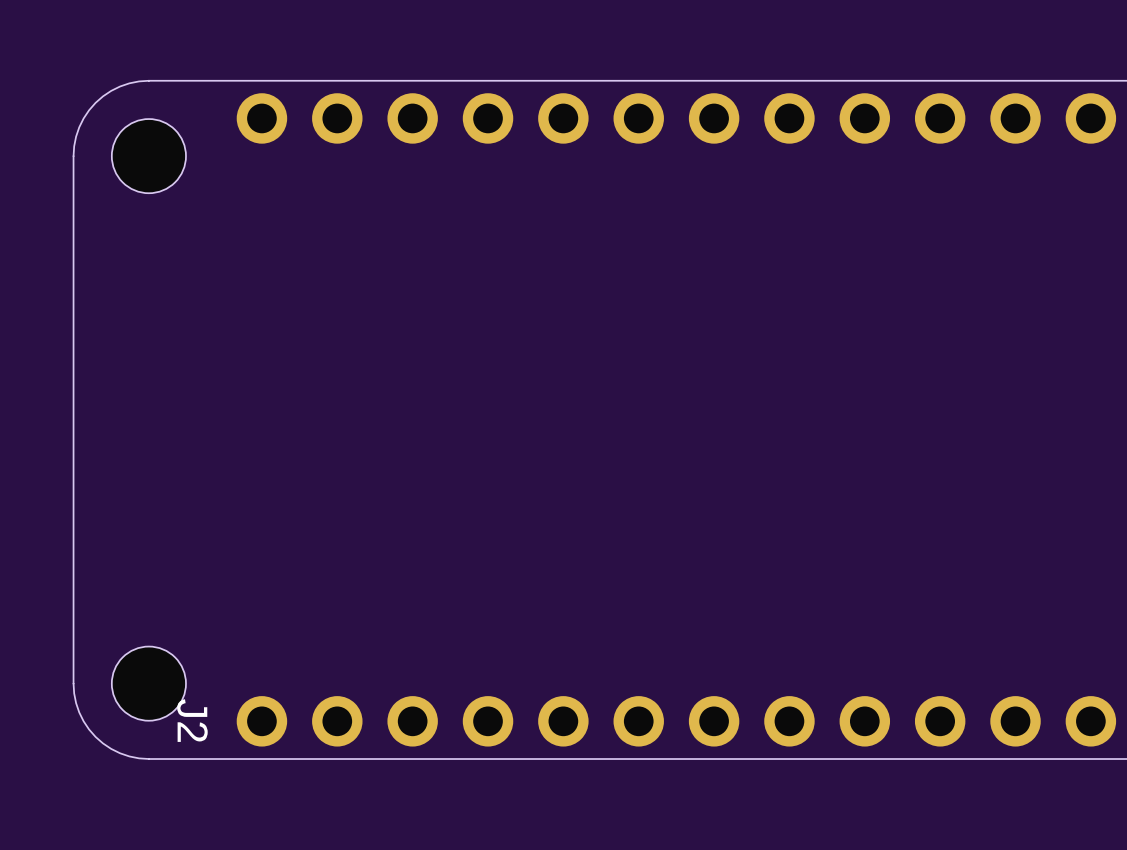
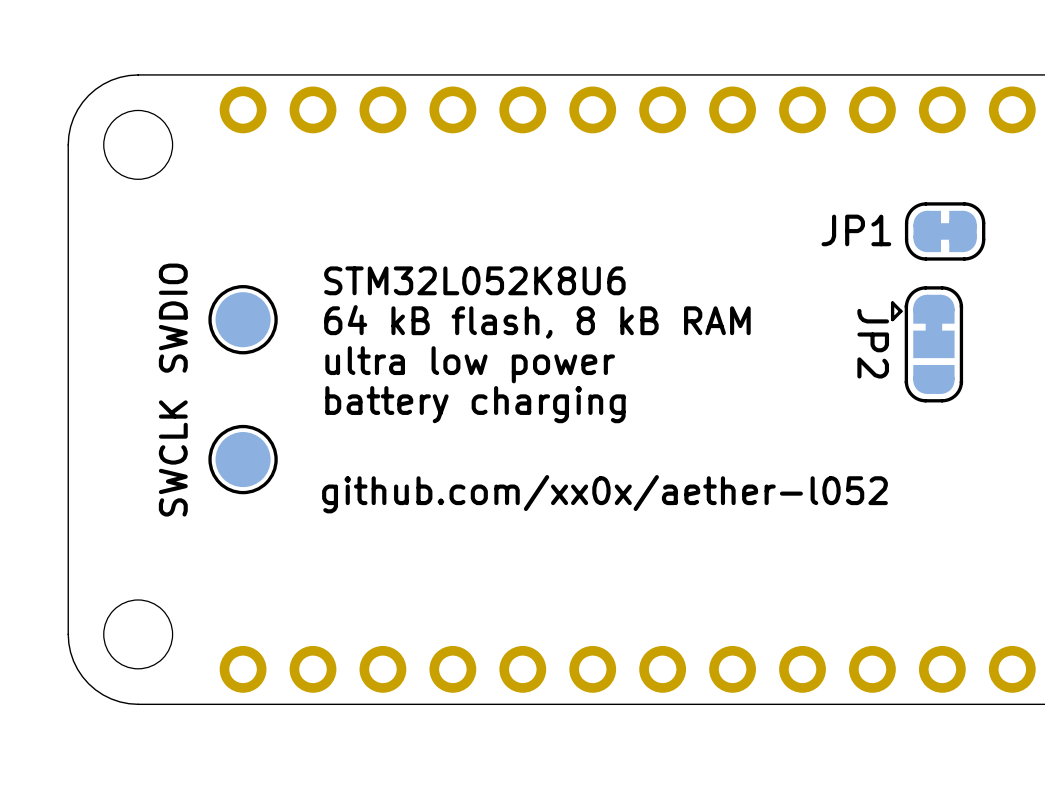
JP1: none -> (945, 231)
text: none -> STM32L052K8U6 (474, 280)
text: none -> SWDIO (173, 318)
part: none -> (243, 319)
text: none -> 64 kB flash, 8 kB RAM (537, 321)
JP2: none -> (927, 344)
text: none -> ultra low power (470, 364)
text: none -> battery charging (475, 404)
text: none -> SWCLK (173, 458)
part: none -> (243, 459)
text: none -> github.com/xx0x/aether-l052 (604, 494)
J2 name: J2 (192, 720) -> none

